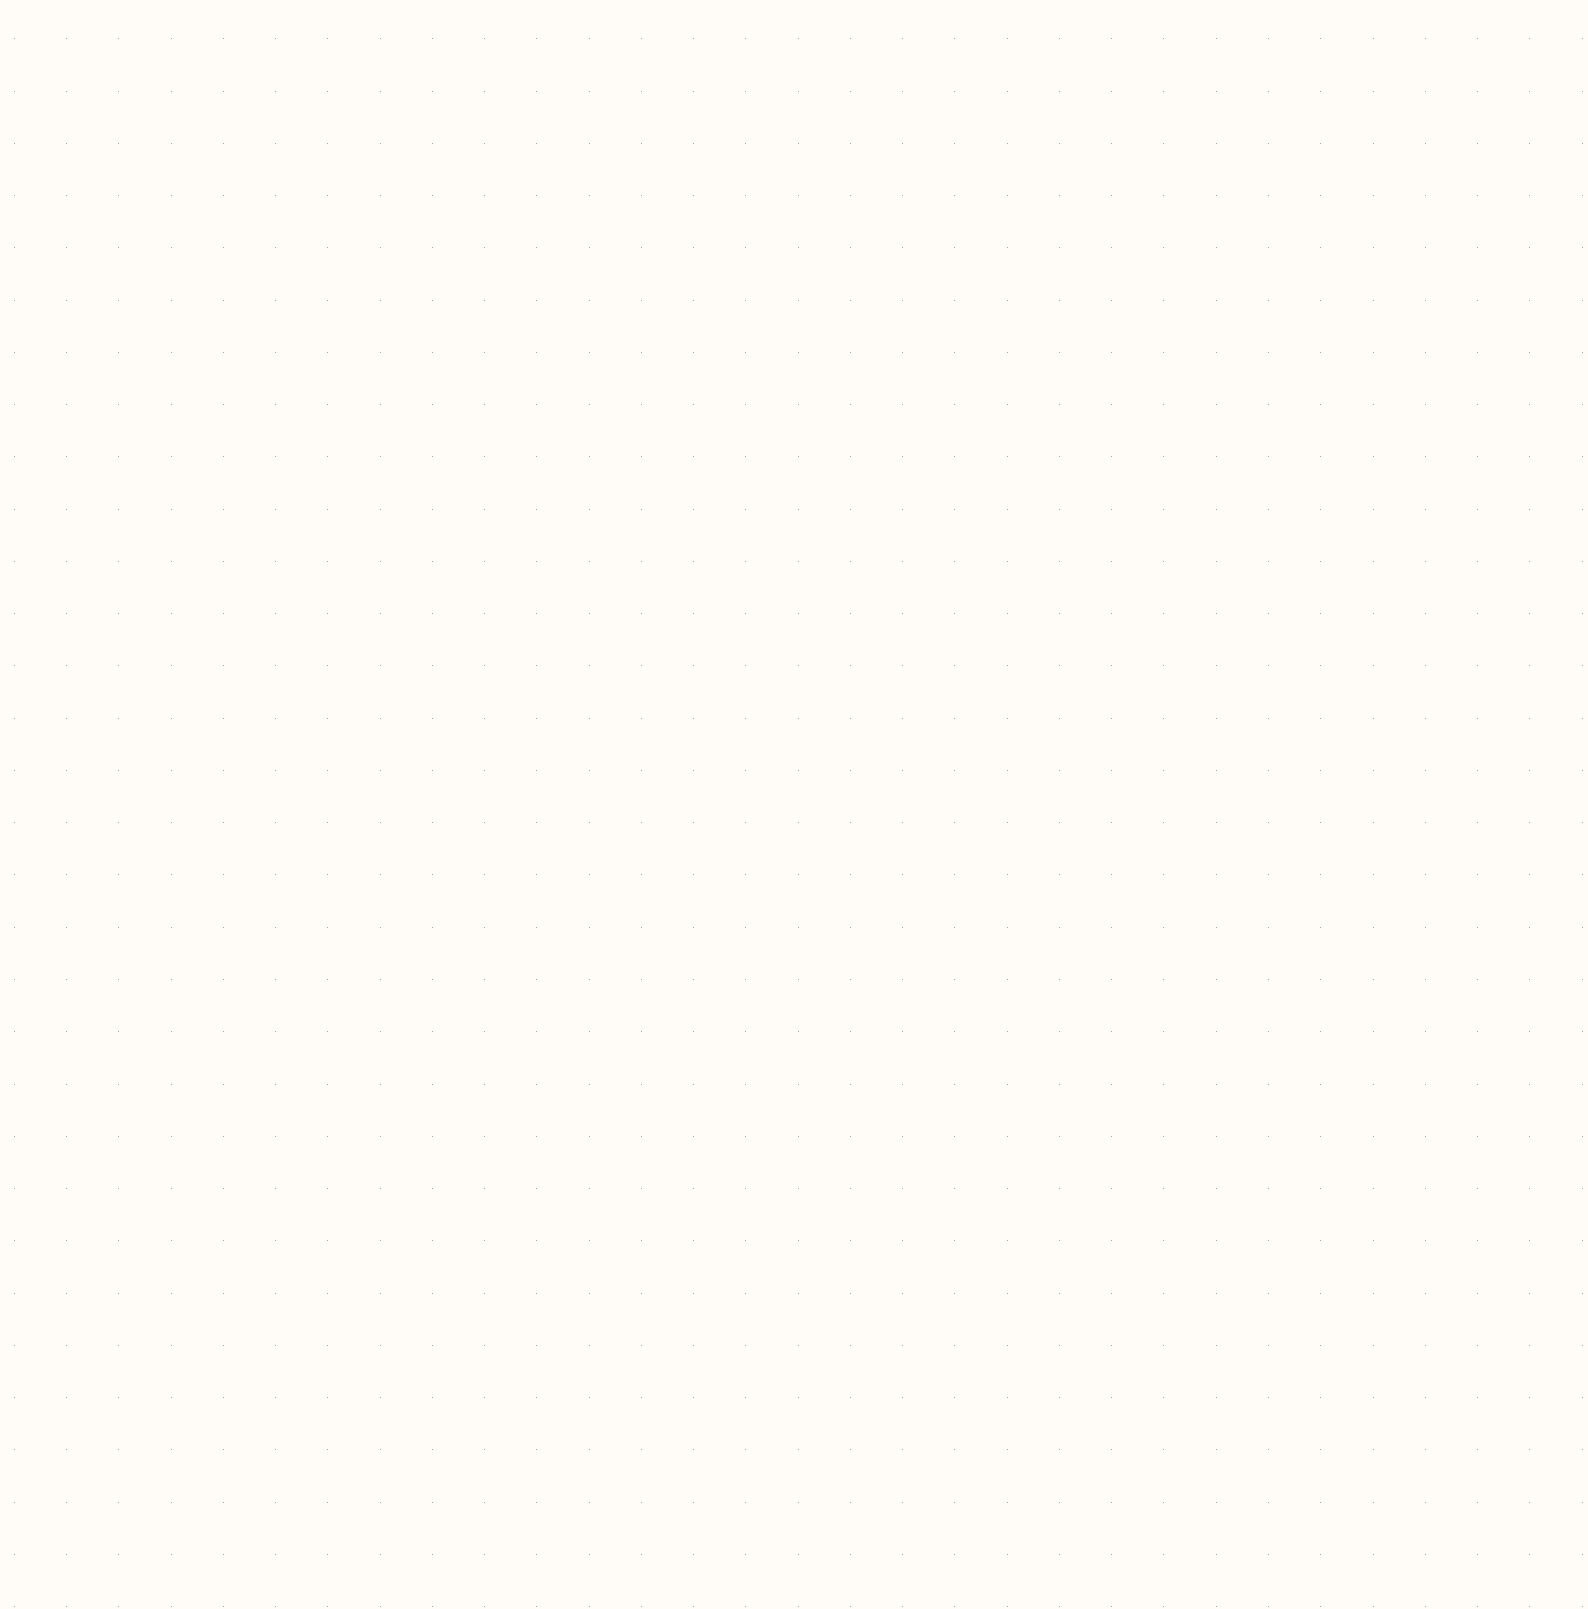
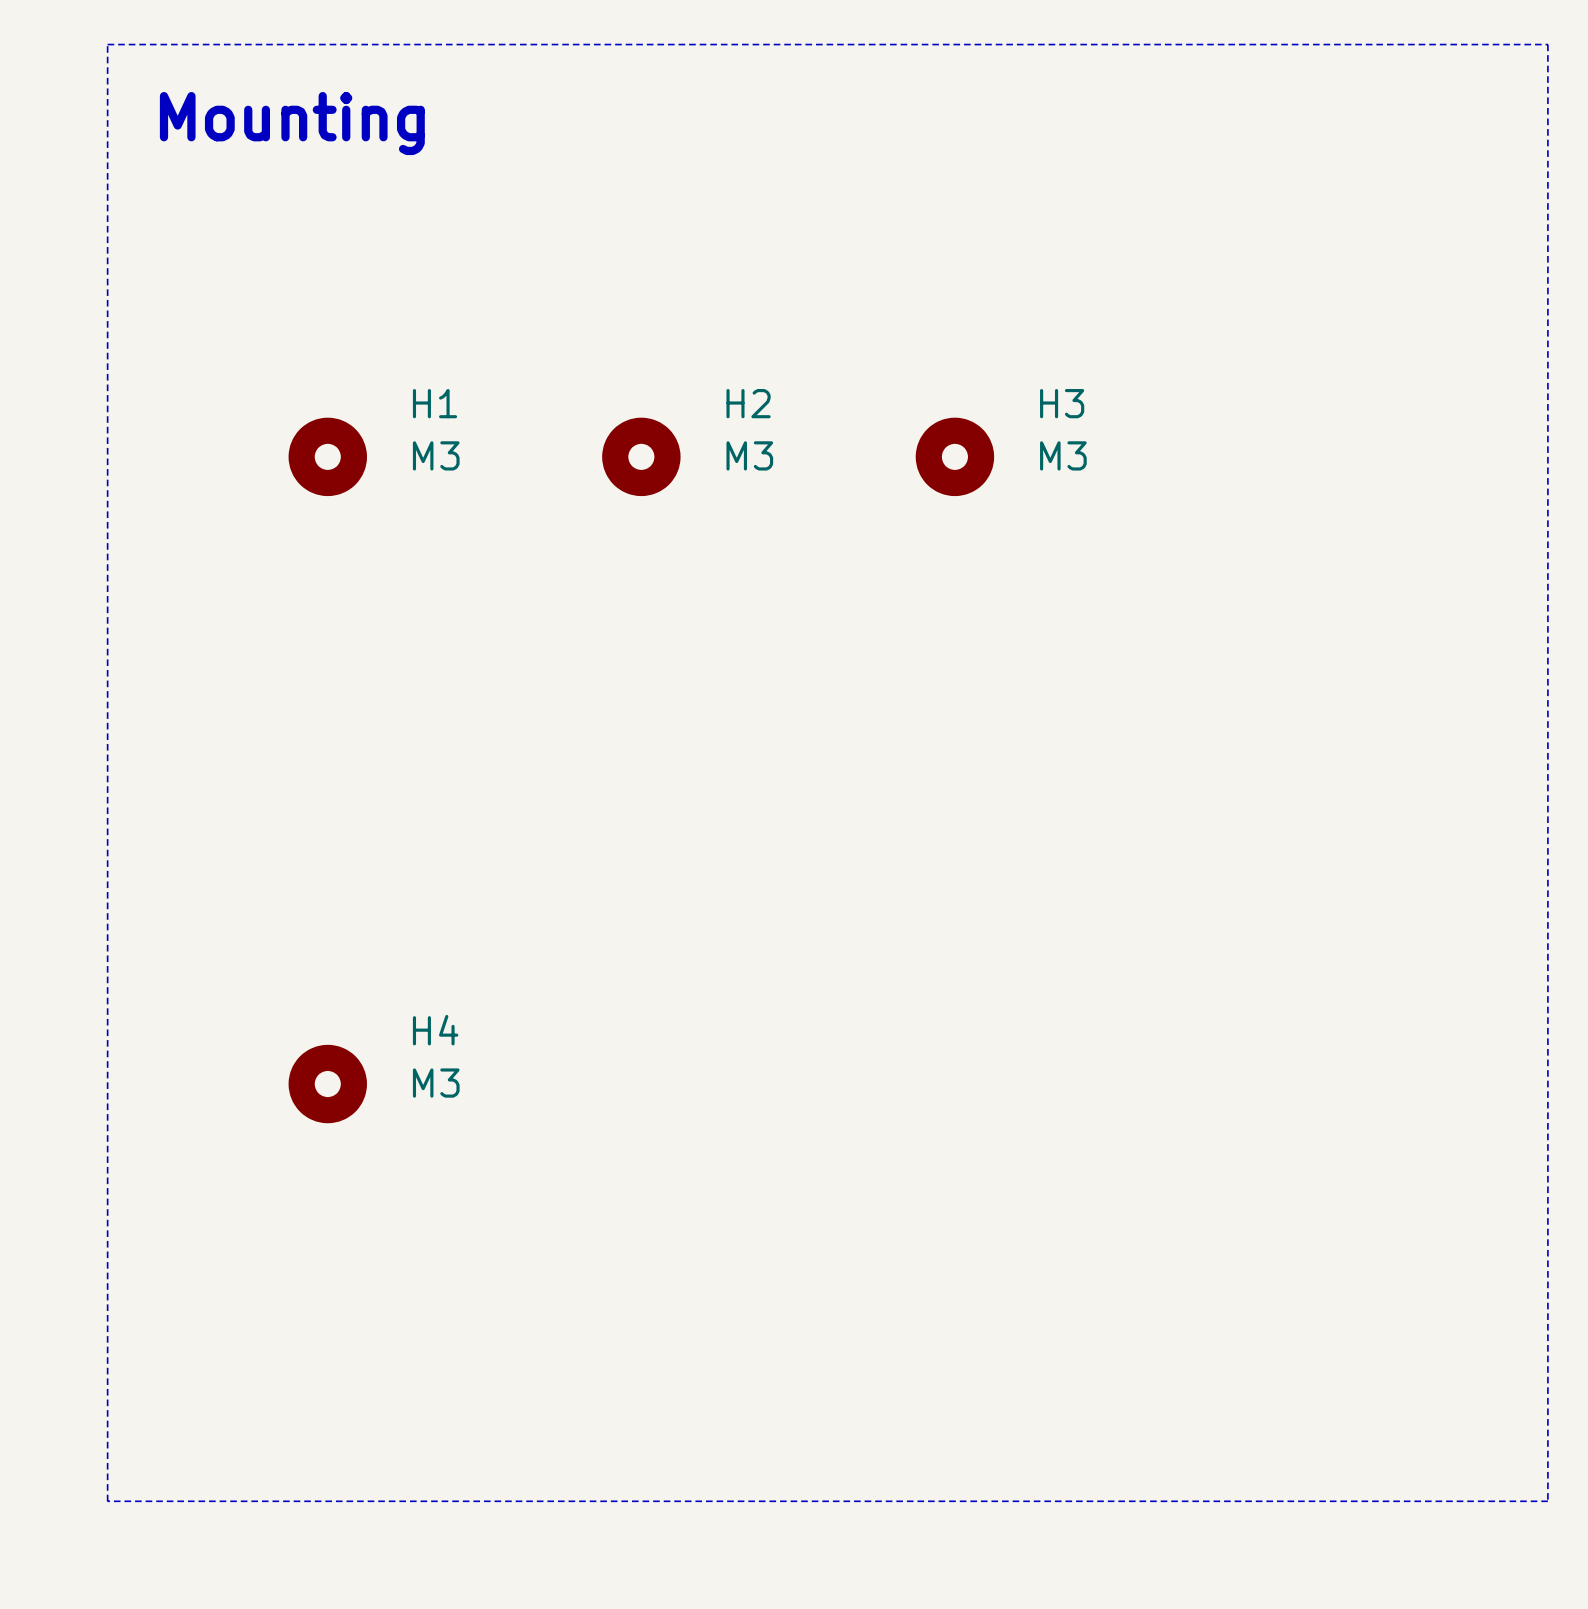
line: none -> (107, 44) (1547, 44) (1547, 1501) (107, 1501) (107, 44)
text: none -> Mounting (292, 123)
H1: none -> M3 (327, 456)
H2: none -> M3 (641, 456)
H3: none -> M3 (954, 456)
H4: none -> M3 (327, 1084)

